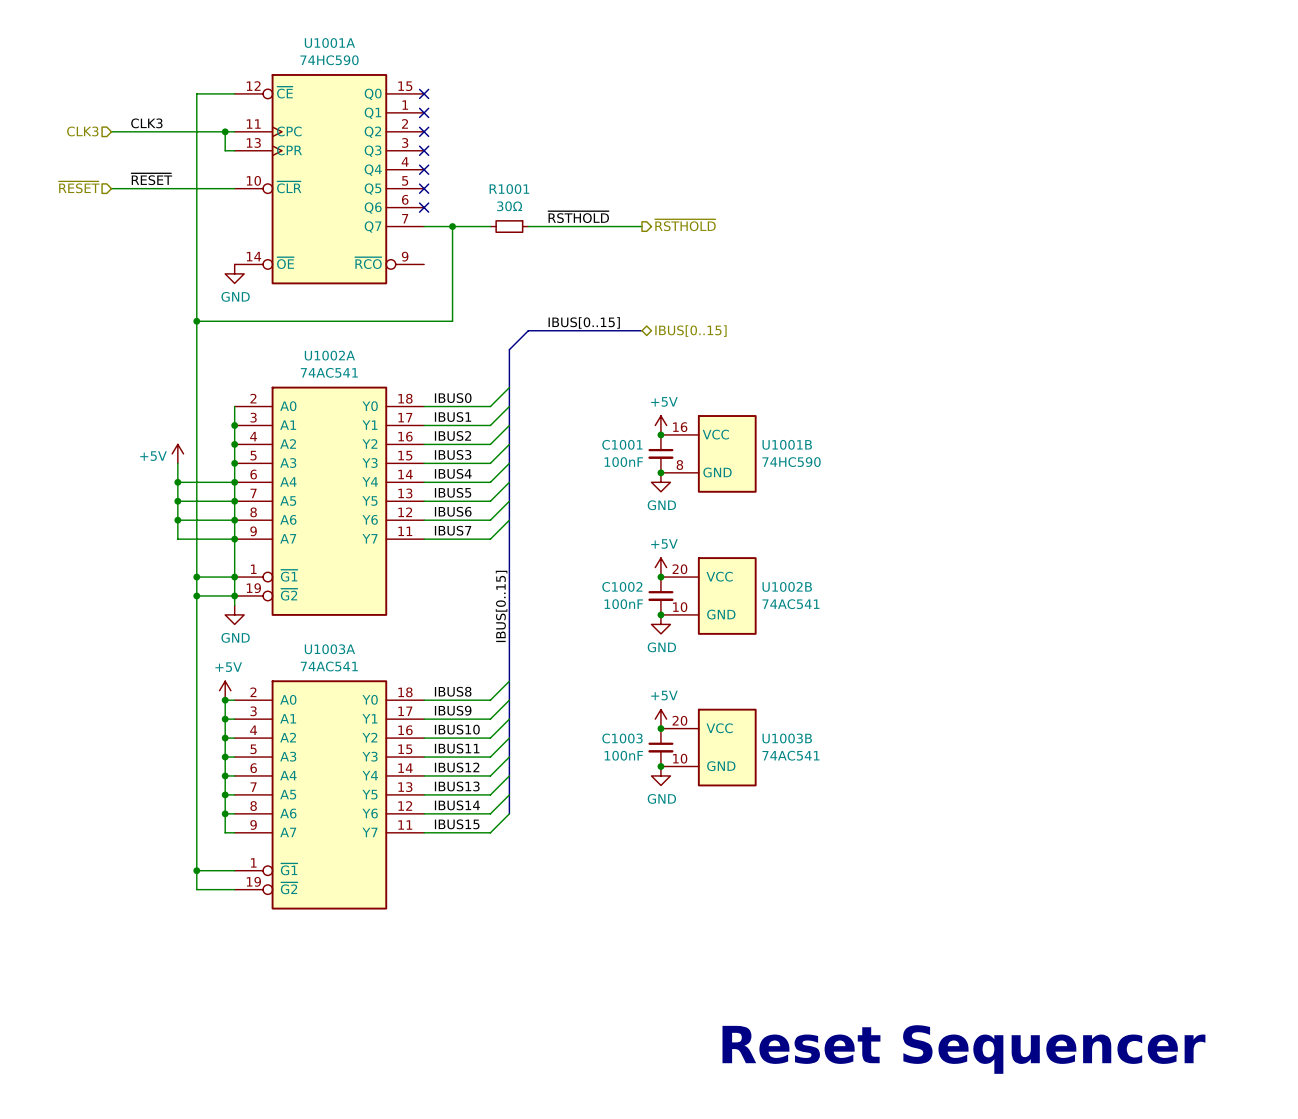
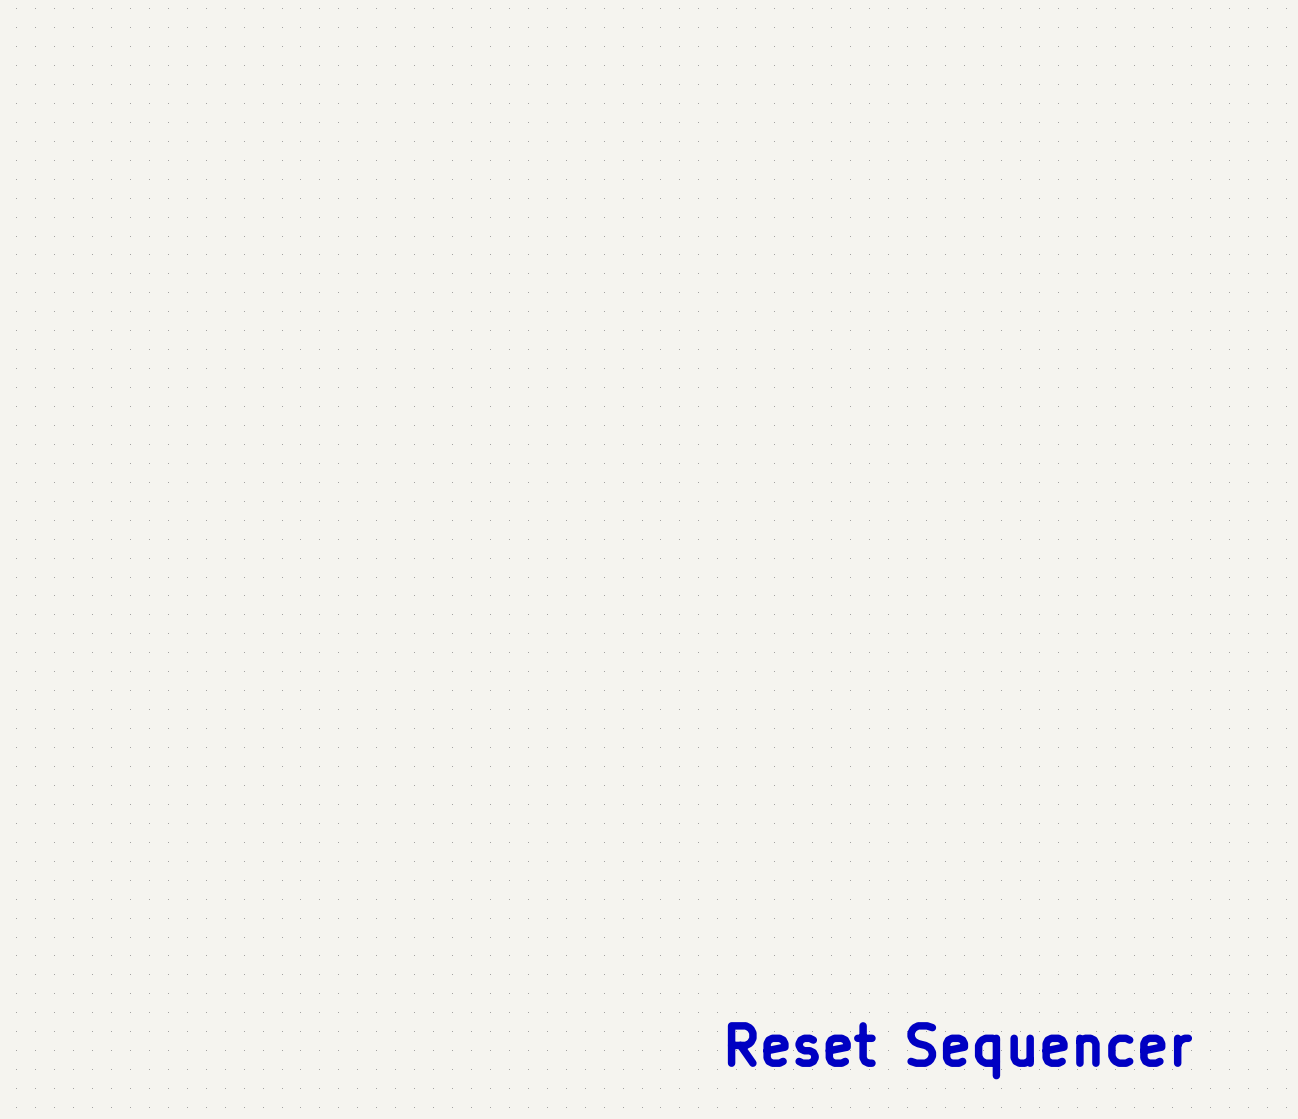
wire: (234, 93) (196, 93) (196, 889) (234, 889) -> none
no-connect mark: (424, 93) -> none
no-connect mark: (424, 112) -> none
label: CLK3 (146, 123) -> none
hierarchical label: CLK3 (82, 131) -> none
wire: (111, 131) (234, 131) -> none
wire: (225, 131) (225, 150) (234, 150) -> none
junction: (225, 131) -> none
no-connect mark: (424, 131) -> none
no-connect mark: (424, 150) -> none
no-connect mark: (424, 169) -> none
label: ~{RESET} (151, 179) -> none
U1001A: 74HC590 (329, 179) -> none
hierarchical label: ~{RESET} (79, 187) -> none
wire: (111, 188) (234, 188) -> none
no-connect mark: (424, 188) -> none
no-connect mark: (424, 207) -> none
label: ~{RSTHOLD} (578, 217) -> none
hierarchical label: ~{RSTHOLD} (685, 225) -> none
wire: (424, 226) (490, 226) -> none
wire: (452, 226) (452, 321) (196, 321) -> none
junction: (452, 226) -> none
R1001: 30Ω (509, 226) -> none
wire: (528, 226) (642, 226) -> none
power symbol: GND (234, 273) -> none
junction: (196, 321) -> none
label: IBUS[0..15] (584, 322) -> none
bus: (642, 330) (528, 330) (509, 349) (509, 813) -> none
hierarchical label: IBUS[0..15] (690, 331) -> none
wire: (509, 387) (490, 406) (424, 406) -> none
label: IBUS0 (453, 398) -> none
wire: (234, 406) (234, 605) -> none
wire: (509, 406) (490, 425) (424, 425) -> none
label: IBUS1 (453, 417) -> none
junction: (234, 425) -> none
wire: (509, 425) (490, 444) (424, 444) -> none
power symbol: +5V (660, 425) -> none
junction: (660, 434) -> none
label: IBUS2 (452, 435) -> none
junction: (234, 444) -> none
wire: (509, 444) (490, 463) (424, 463) -> none
power symbol: +5V (177, 453) -> none
C1001: 100nF (660, 453) -> none
U1001B: 74HC590 (708, 453) -> none
label: IBUS3 (453, 454) -> none
wire: (177, 463) (177, 539) (234, 539) -> none
junction: (234, 463) -> none
wire: (509, 463) (490, 482) (424, 482) -> none
junction: (660, 472) -> none
label: IBUS4 (453, 473) -> none
wire: (177, 482) (234, 482) -> none
junction: (177, 482) -> none
junction: (234, 482) -> none
wire: (509, 482) (490, 501) (424, 501) -> none
power symbol: GND (660, 482) -> none
label: IBUS5 (453, 492) -> none
wire: (177, 501) (234, 501) -> none
junction: (177, 501) -> none
junction: (234, 501) -> none
U1002A: 74AC541 (329, 501) -> none
wire: (509, 501) (490, 520) (424, 520) -> none
label: IBUS6 (453, 511) -> none
wire: (177, 520) (234, 520) -> none
junction: (177, 520) -> none
junction: (234, 520) -> none
wire: (509, 520) (490, 539) (424, 539) -> none
label: IBUS7 (453, 530) -> none
junction: (234, 539) -> none
power symbol: +5V (660, 567) -> none
wire: (196, 577) (234, 577) -> none
junction: (196, 577) -> none
junction: (234, 577) -> none
junction: (660, 577) -> none
wire: (196, 595) (234, 595) -> none
junction: (196, 595) -> none
junction: (234, 595) -> none
C1002: 100nF (660, 595) -> none
U1002B: 74AC541 (708, 595) -> none
label: IBUS[0..15] (501, 606) -> none
power symbol: GND (234, 614) -> none
junction: (660, 614) -> none
power symbol: GND (660, 624) -> none
wire: (509, 681) (490, 700) (424, 700) -> none
power symbol: +5V (225, 690) -> none
label: IBUS8 (453, 691) -> none
junction: (225, 700) -> none
wire: (234, 700) (225, 700) (225, 832) (234, 832) -> none
wire: (509, 700) (490, 719) (424, 719) -> none
label: IBUS9 (453, 710) -> none
wire: (225, 719) (234, 719) -> none
junction: (225, 719) -> none
wire: (509, 719) (490, 738) (424, 738) -> none
power symbol: +5V (660, 719) -> none
junction: (660, 728) -> none
label: IBUS10 (457, 729) -> none
wire: (225, 738) (234, 738) -> none
junction: (225, 738) -> none
wire: (509, 738) (490, 757) (424, 757) -> none
C1003: 100nF (660, 747) -> none
U1003B: 74AC541 (708, 747) -> none
label: IBUS11 (457, 748) -> none
wire: (225, 757) (234, 757) -> none
junction: (225, 757) -> none
wire: (509, 757) (490, 775) (424, 775) -> none
junction: (660, 766) -> none
label: IBUS12 (457, 767) -> none
wire: (225, 775) (234, 775) -> none
junction: (225, 775) -> none
wire: (509, 775) (490, 794) (424, 794) -> none
power symbol: GND (660, 775) -> none
label: IBUS13 (457, 786) -> none
wire: (225, 794) (234, 794) -> none
junction: (225, 794) -> none
U1003A: 74AC541 (329, 794) -> none
wire: (509, 794) (490, 813) (424, 813) -> none
label: IBUS14 (457, 805) -> none
wire: (225, 813) (234, 813) -> none
junction: (225, 813) -> none
wire: (509, 813) (490, 832) (424, 832) -> none
label: IBUS15 (457, 824) -> none
wire: (196, 870) (234, 870) -> none
junction: (196, 870) -> none

